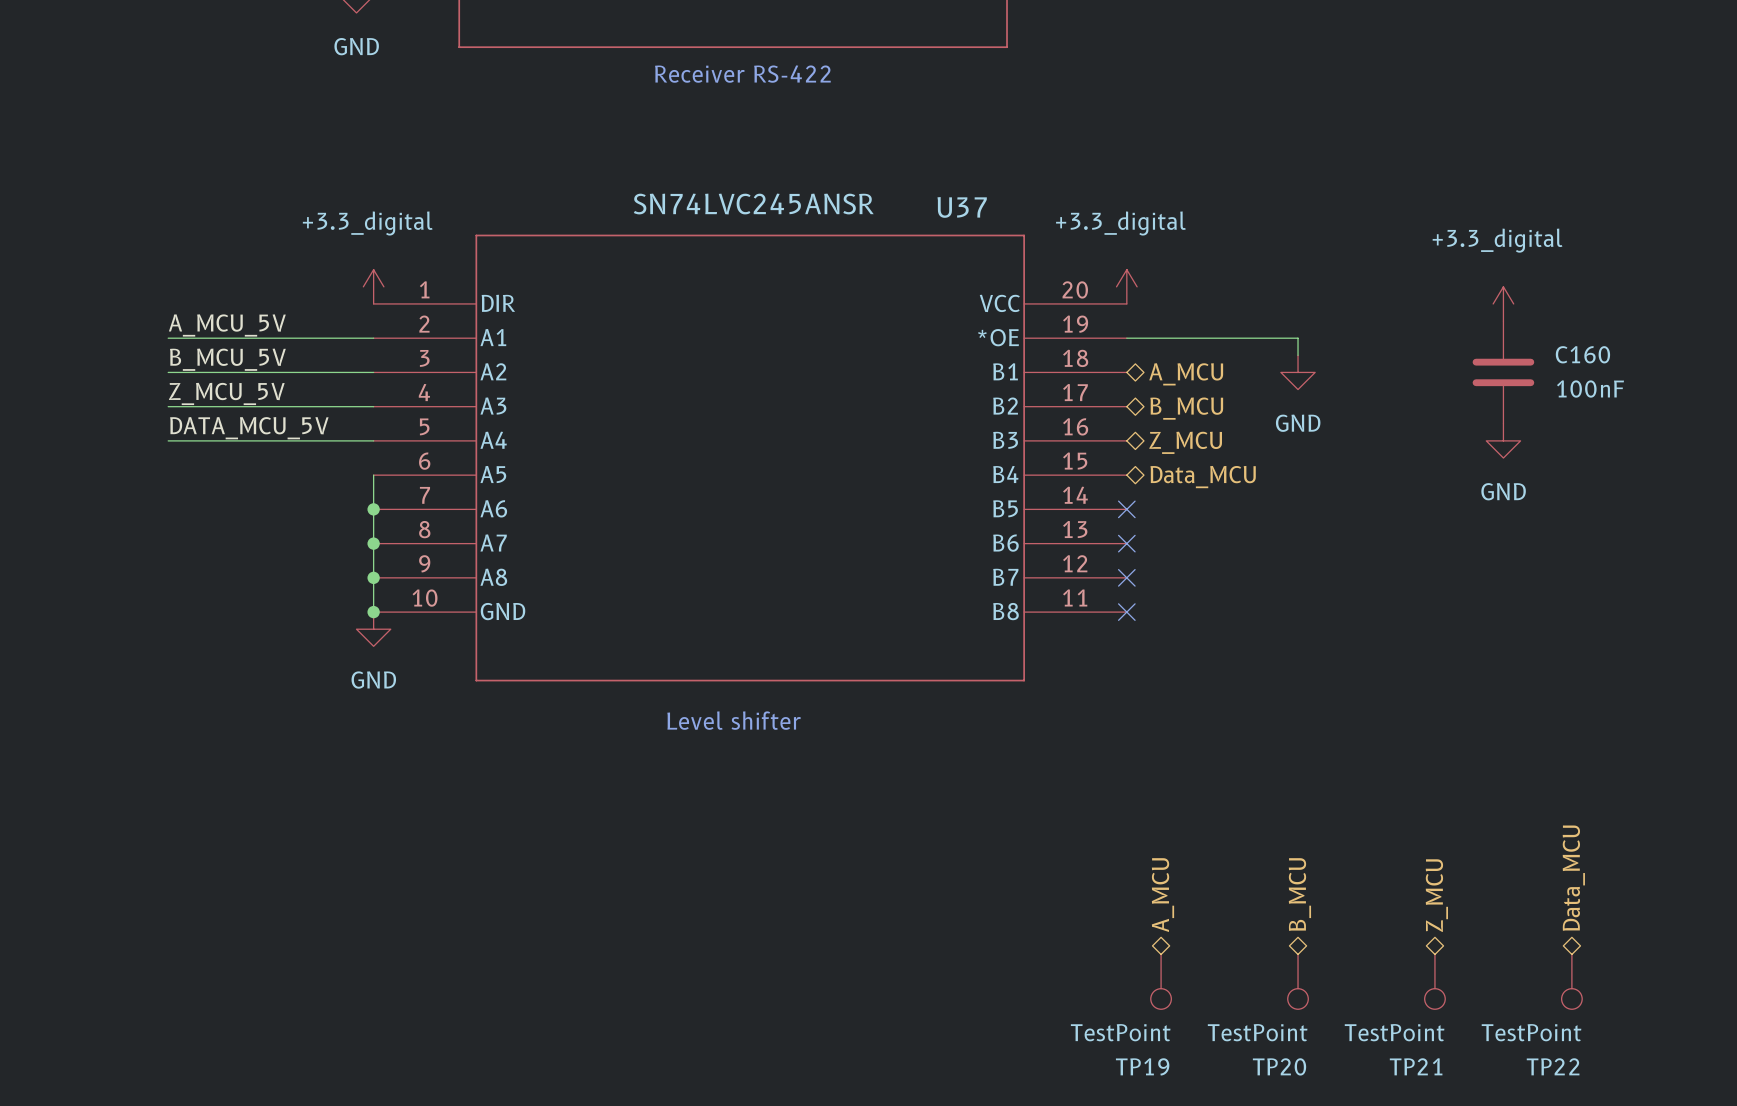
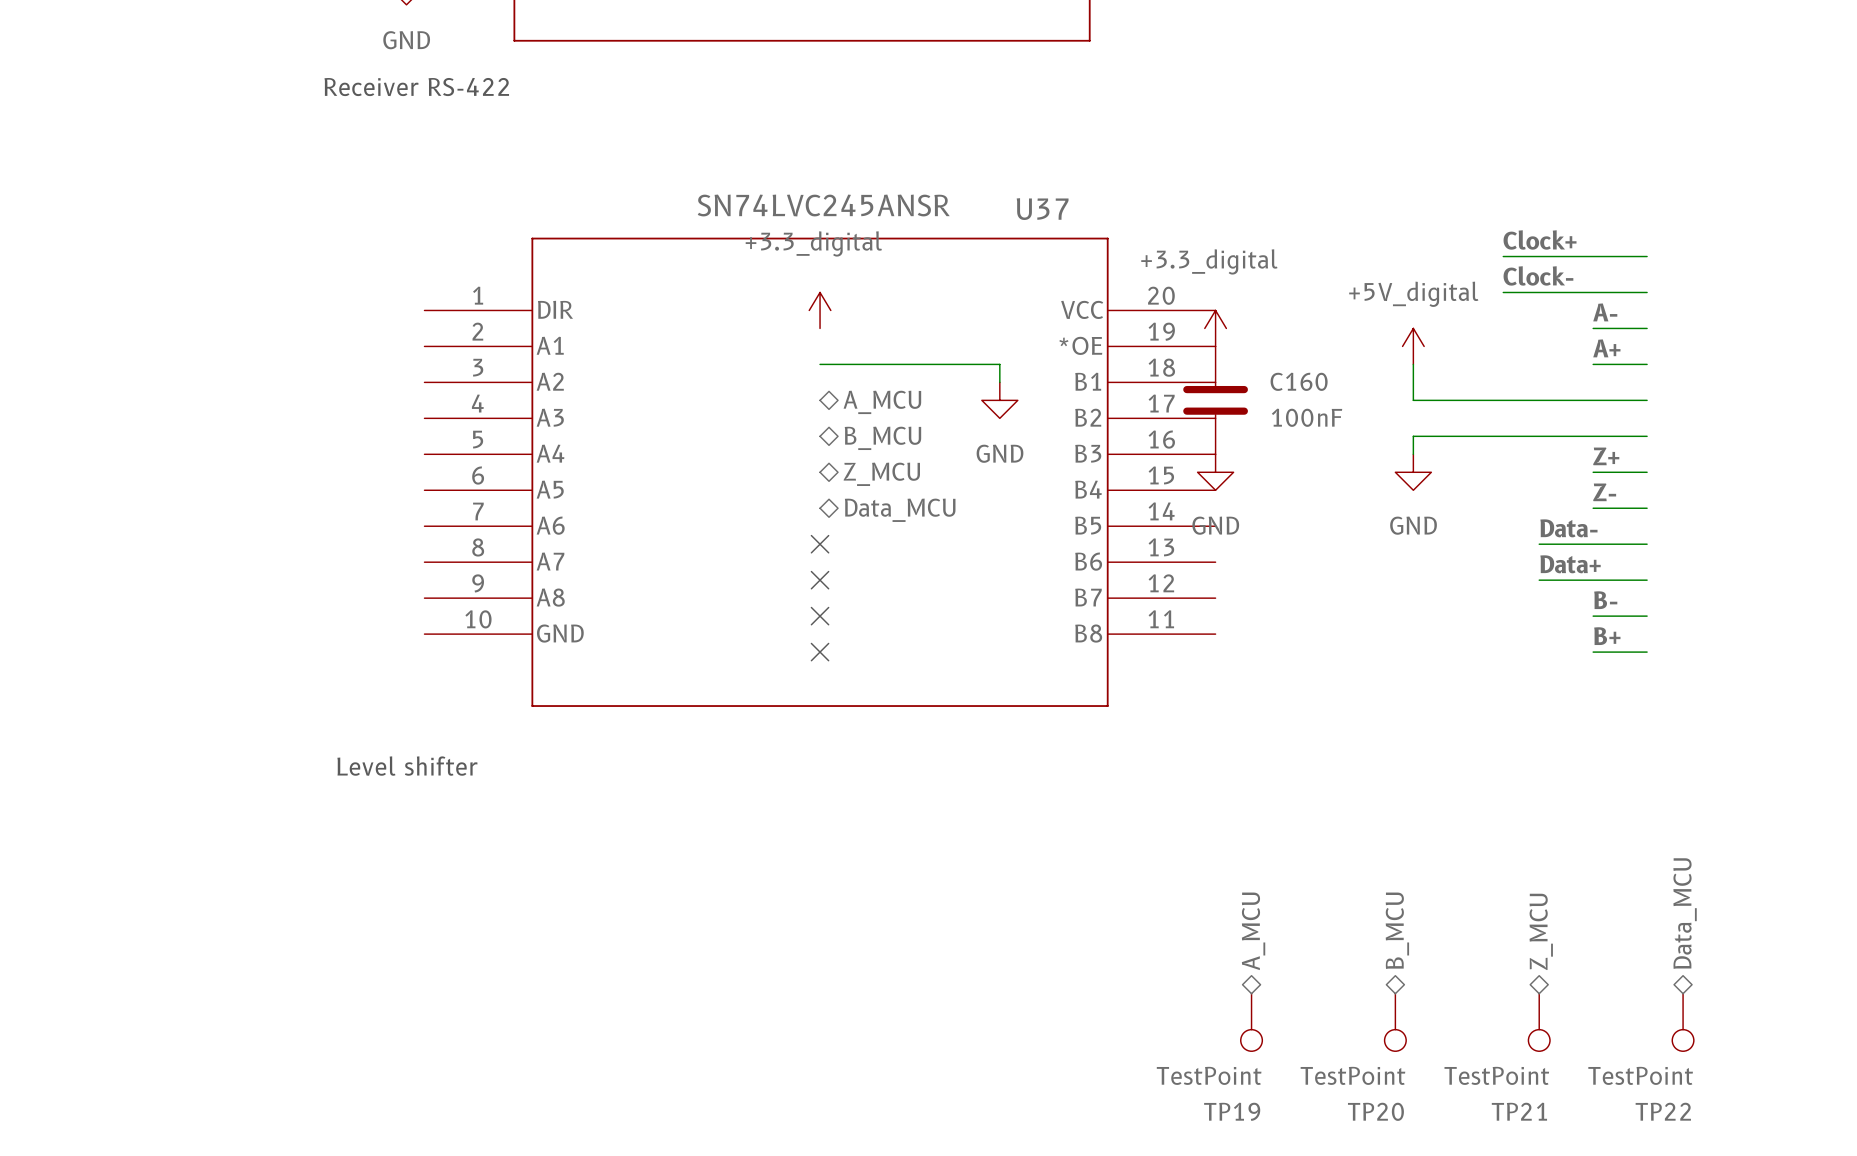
text: Receiver RS-422 (742, 74) -> none
text: none -> Receiver RS-422 (416, 87)
label: none -> Clock+ (1540, 239)
wire: none -> (1503, 256) (1647, 256)
label: none -> Clock- (1538, 275)
power symbol: +3.3_digital (373, 286) -> none
power symbol position: +3.3_digital (1126, 286) -> +3.3_digital (1215, 328)
wire: none -> (1503, 292) (1647, 292)
power symbol: none -> +3.3_digital (820, 310)
power symbol: +3.3_digital (1503, 303) -> none
label: none -> A- (1605, 312)
wire: none -> (1593, 328) (1647, 328)
label: A_MCU_5V (227, 325) -> none
wire: (168, 338) (373, 338) -> none
wire: (1126, 338) (1298, 338) (1298, 355) -> none
power symbol: none -> +5V_digital (1413, 346)
label: none -> A+ (1606, 348)
wire: none -> (820, 364) (999, 364) (999, 382)
wire: none -> (1413, 364) (1413, 400) (1647, 400)
wire: none -> (1593, 364) (1647, 364)
label: B_MCU_5V (227, 359) -> none
wire: (168, 372) (373, 372) -> none
power symbol position: GND (1298, 372) -> GND (1413, 472)
C160 position: (1503, 372) -> (1215, 400)
hierarchical label: A_MCU (1186, 374) -> none
power symbol: none -> GND (999, 400)
hierarchical label: none -> A_MCU (882, 402)
label: Z_MCU_5V (226, 393) -> none
wire: (168, 406) (373, 406) -> none
hierarchical label: B_MCU (1186, 408) -> none
wire: none -> (1647, 436) (1413, 436) (1413, 454)
hierarchical label: none -> B_MCU (882, 438)
label: DATA_MCU_5V (249, 428) -> none
wire: (168, 440) (373, 440) -> none
power symbol: GND (1503, 440) -> none
hierarchical label: Z_MCU (1185, 442) -> none
label: none -> Z+ (1606, 456)
power symbol: none -> GND (1215, 472)
wire: none -> (1593, 472) (1647, 472)
hierarchical label: none -> Z_MCU (881, 474)
wire: (373, 475) (373, 612) -> none
hierarchical label: Data_MCU (1203, 477) -> none
label: none -> Z- (1604, 492)
wire: none -> (1593, 508) (1647, 508)
hierarchical label: none -> Data_MCU (900, 510)
junction: (373, 509) -> none
no-connect mark: (1126, 509) -> none
label: none -> Data- (1568, 528)
no-connect mark: none -> (820, 544)
wire: none -> (1539, 544) (1647, 544)
junction: (373, 543) -> none
no-connect mark: (1126, 543) -> none
label: none -> Data+ (1570, 564)
no-connect mark: none -> (820, 580)
wire: none -> (1539, 580) (1647, 580)
junction: (373, 577) -> none
no-connect mark: (1126, 577) -> none
label: none -> B- (1605, 600)
no-connect mark: none -> (820, 616)
wire: none -> (1593, 616) (1647, 616)
junction: (373, 612) -> none
no-connect mark: (1126, 612) -> none
label: none -> B+ (1607, 636)
power symbol: GND (373, 629) -> none
no-connect mark: none -> (820, 652)
wire: none -> (1593, 652) (1647, 652)
text: Level shifter (734, 720) -> none
text: none -> Level shifter (407, 766)

